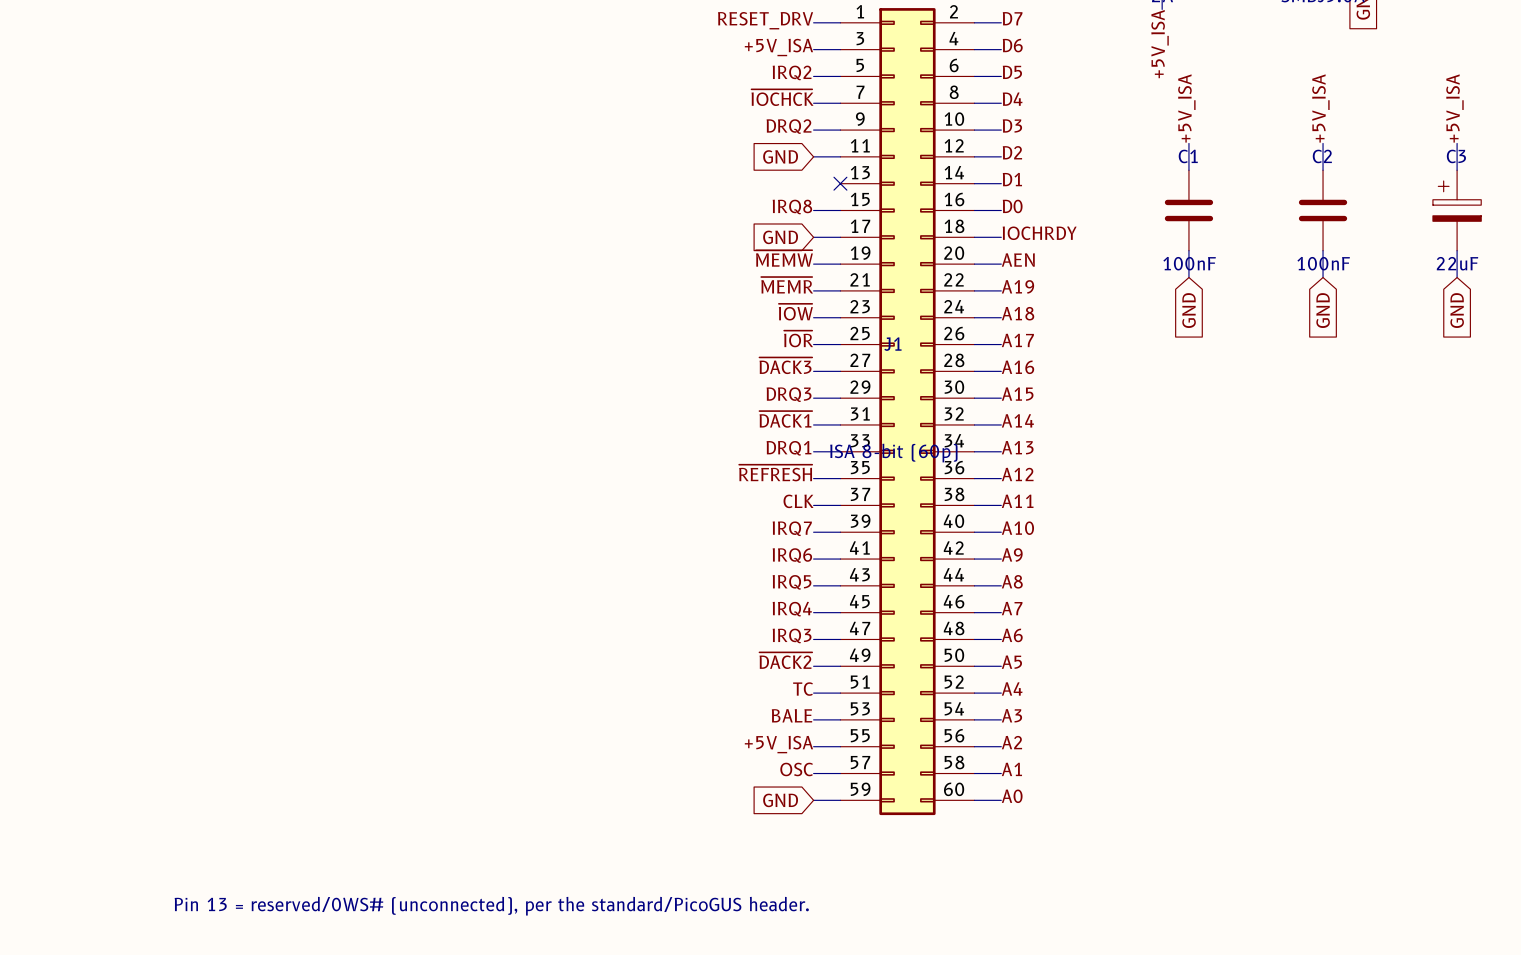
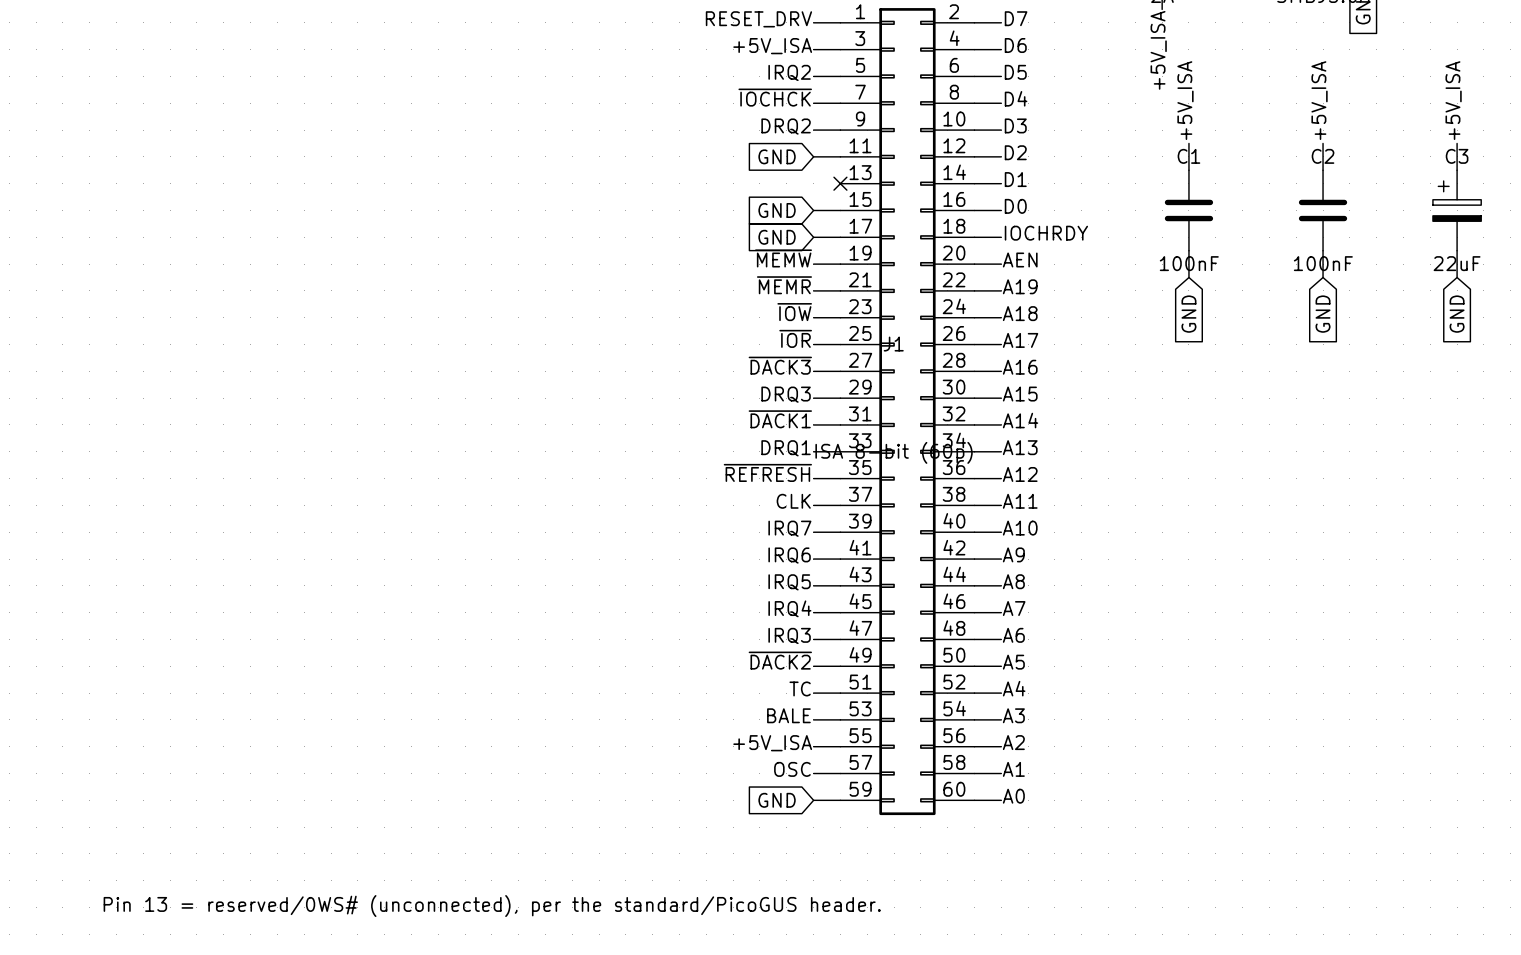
label: IRQ8 (792, 207) -> none
global label: none -> GND (777, 210)

